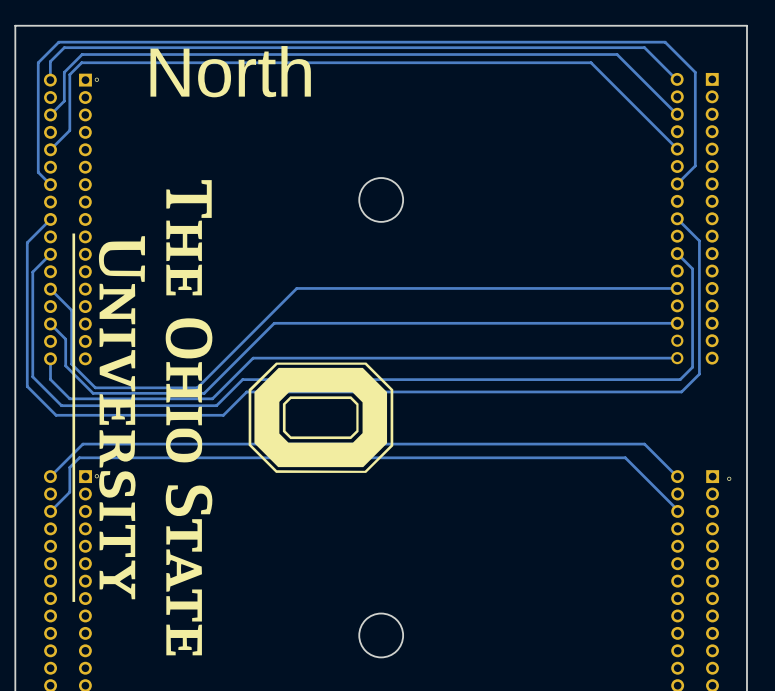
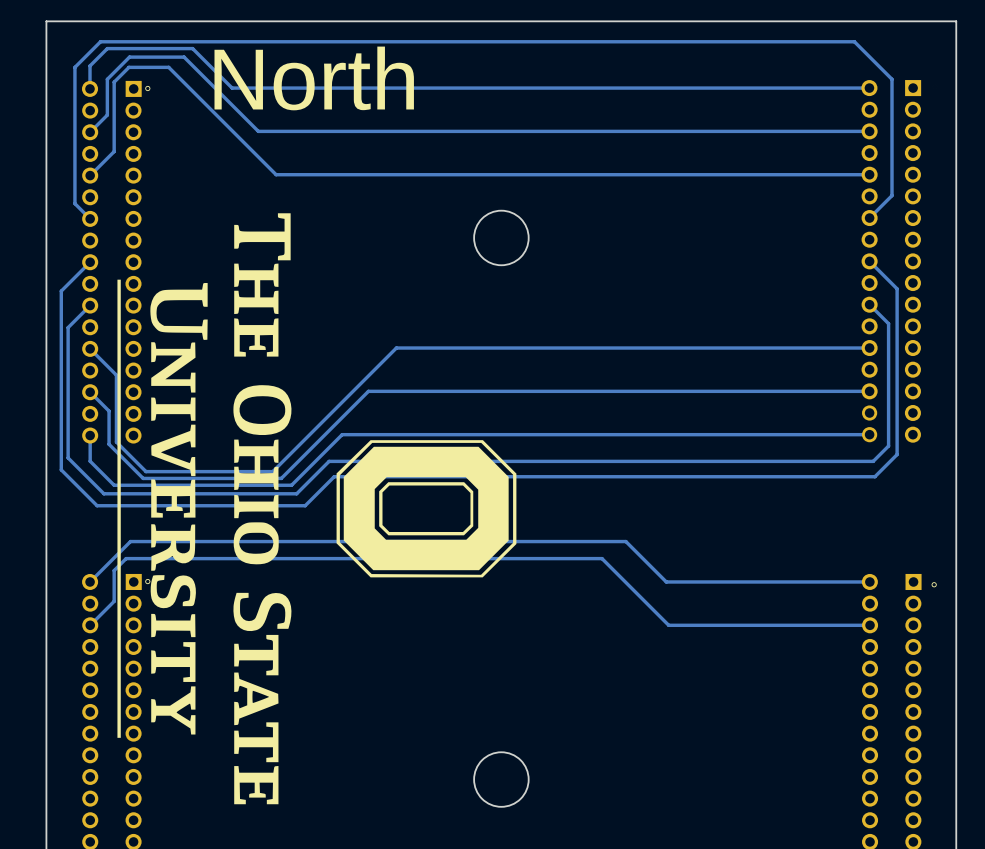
track: (132, 47) (644, 47) (676, 79) -> (192, 48) (232, 88) (868, 88)
track: (126, 54) (617, 54) (676, 114) -> (184, 57) (258, 131) (869, 131)
track: (113, 62) (591, 62) (677, 149) -> (168, 67) (276, 174) (869, 174)
track: (481, 444) (644, 444) (677, 476) -> (625, 541) (666, 581) (869, 581)
track: (462, 457) (625, 457) (677, 511) -> (602, 558) (668, 625) (870, 625)

